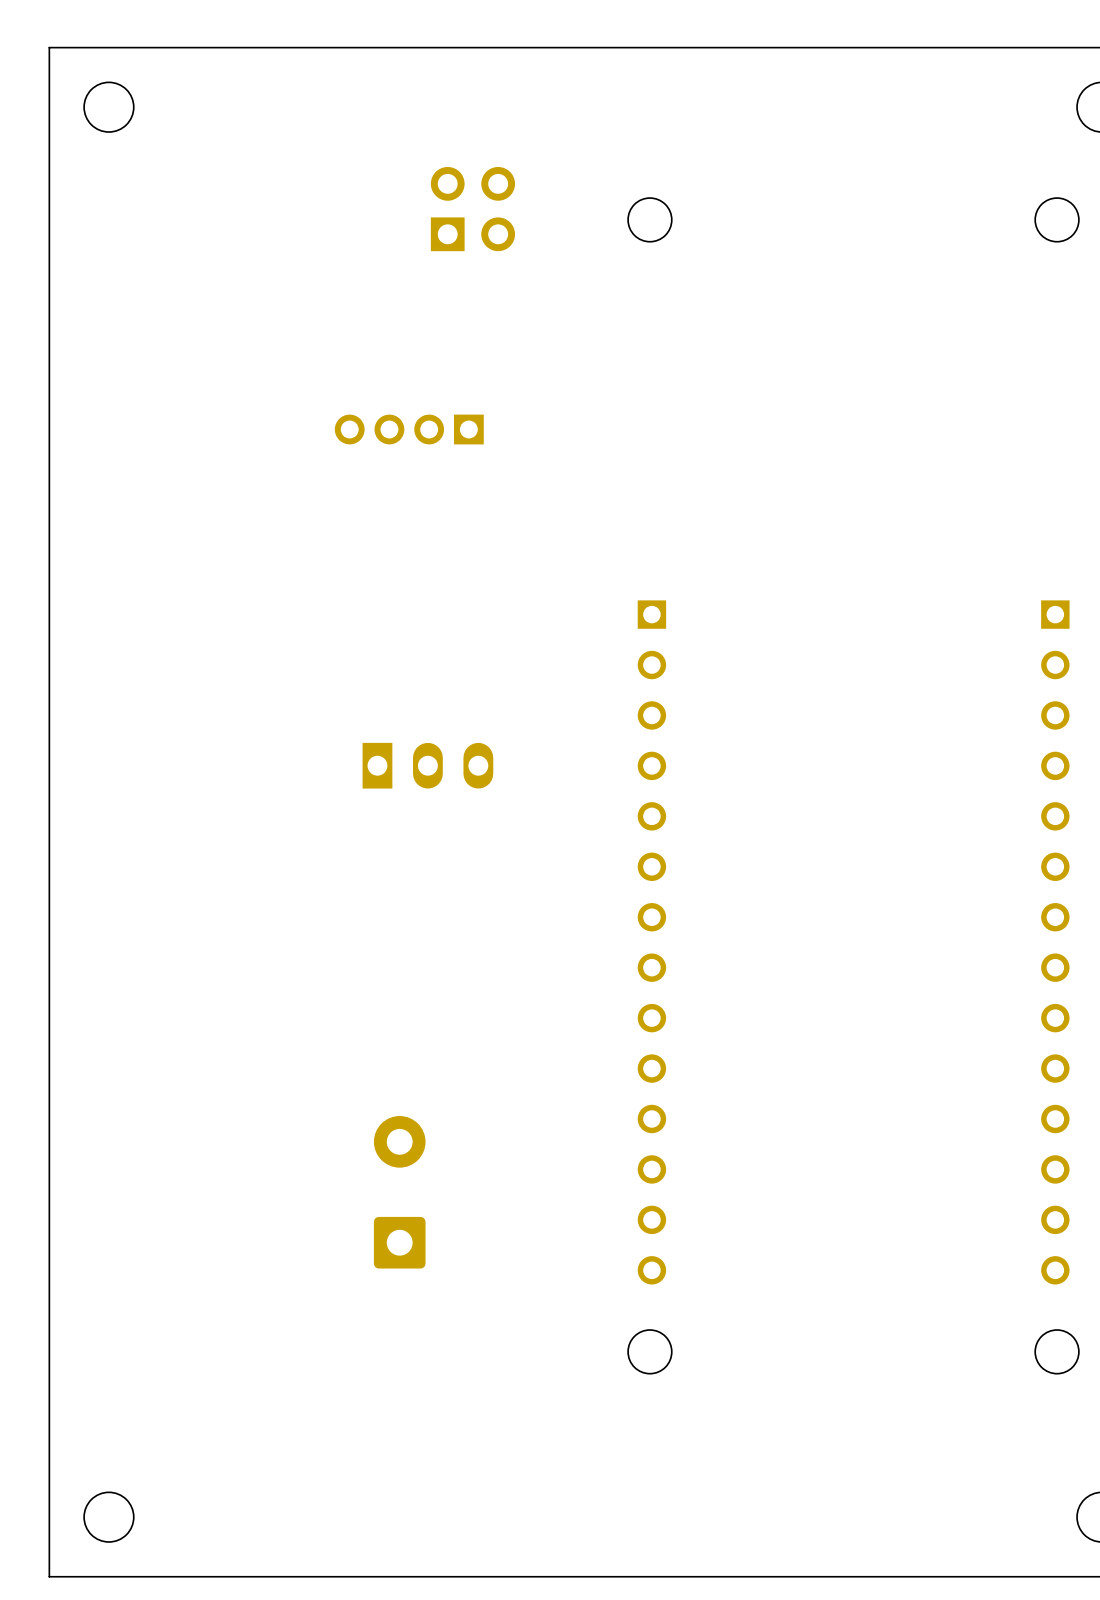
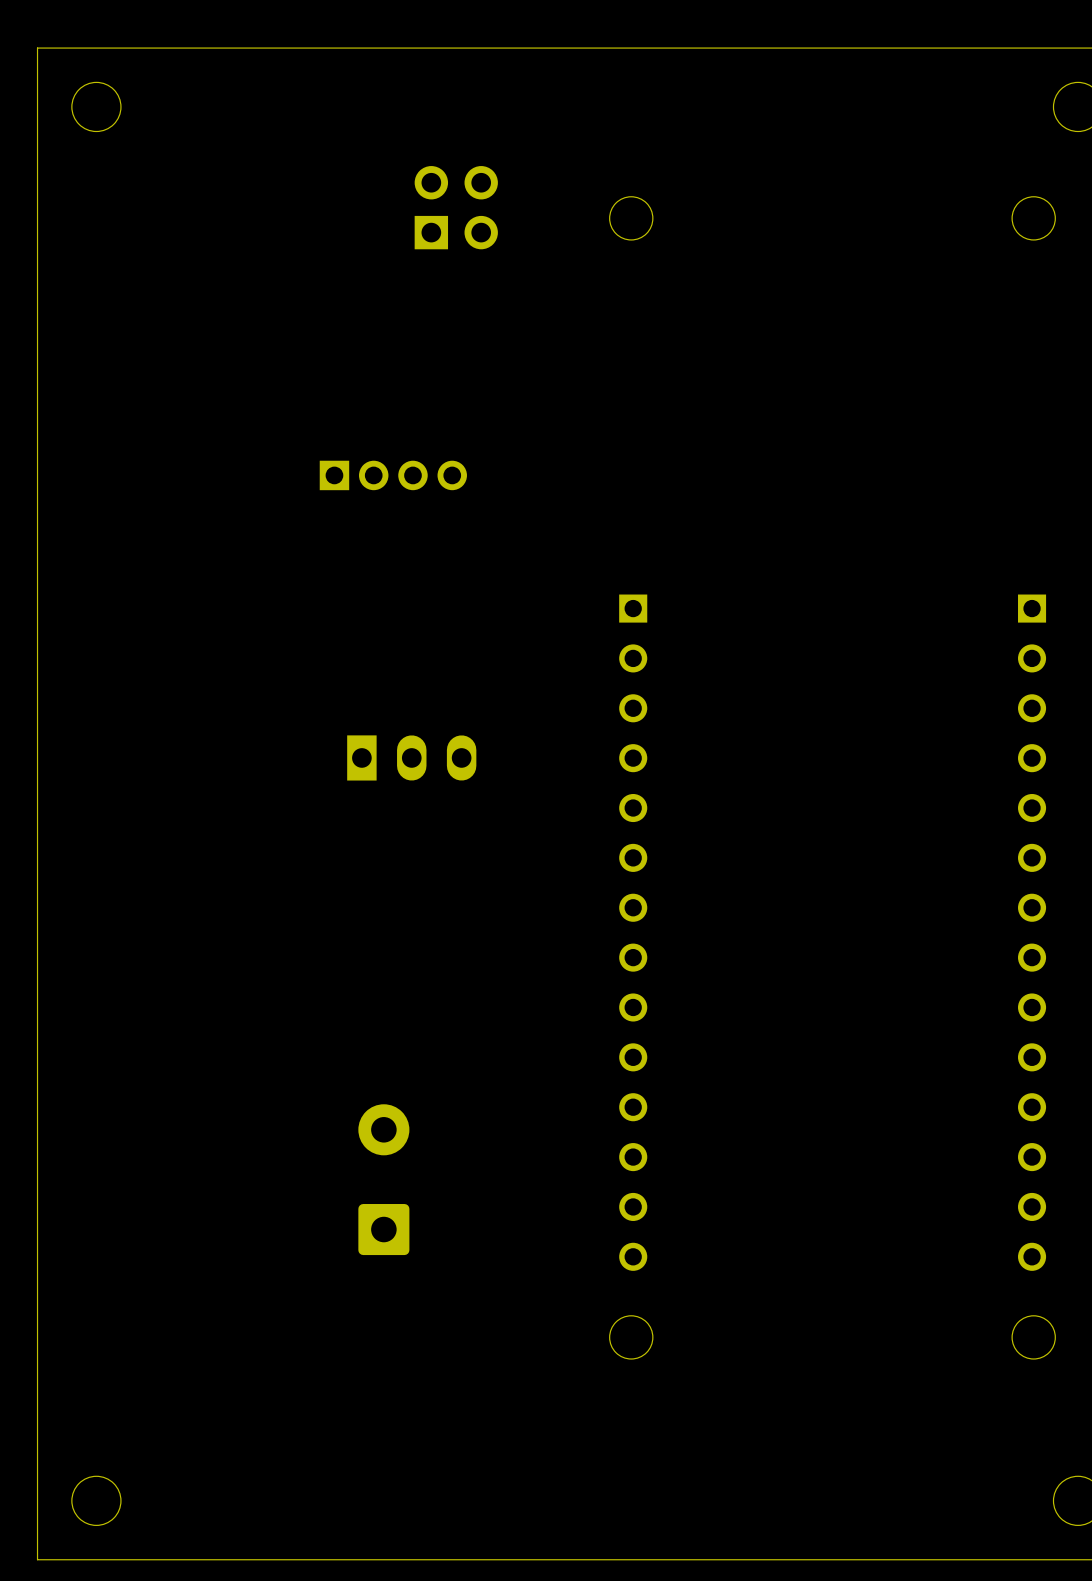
part rotation: 0° (409, 429) -> 180° (393, 475)

